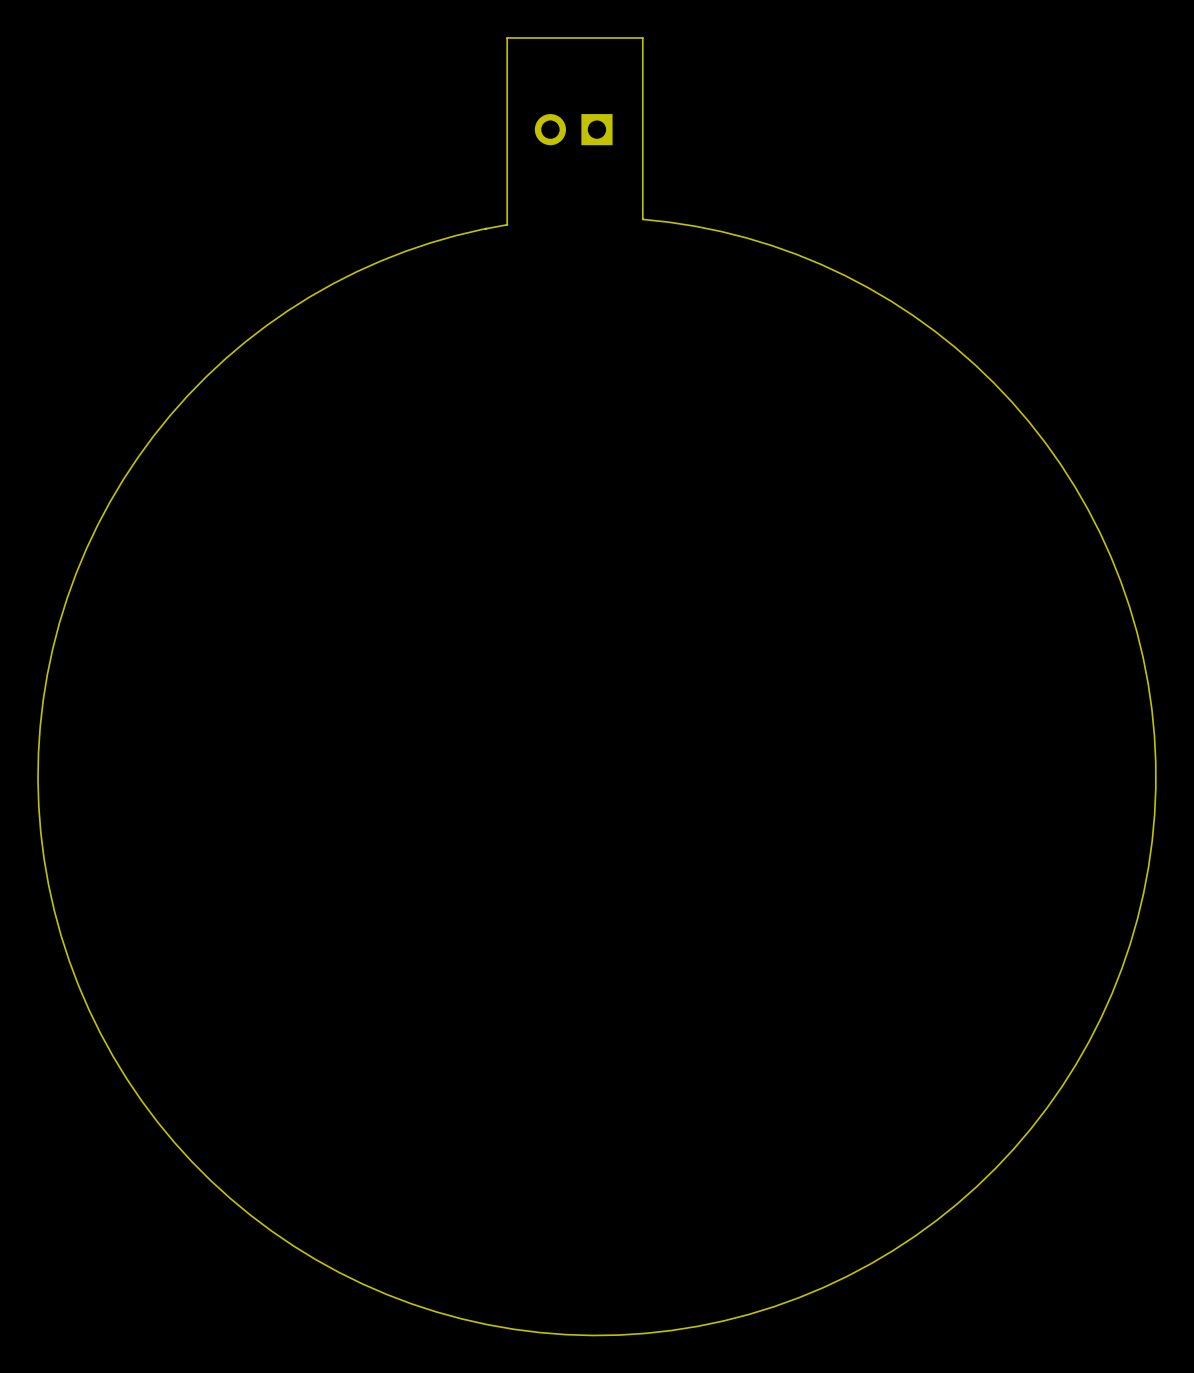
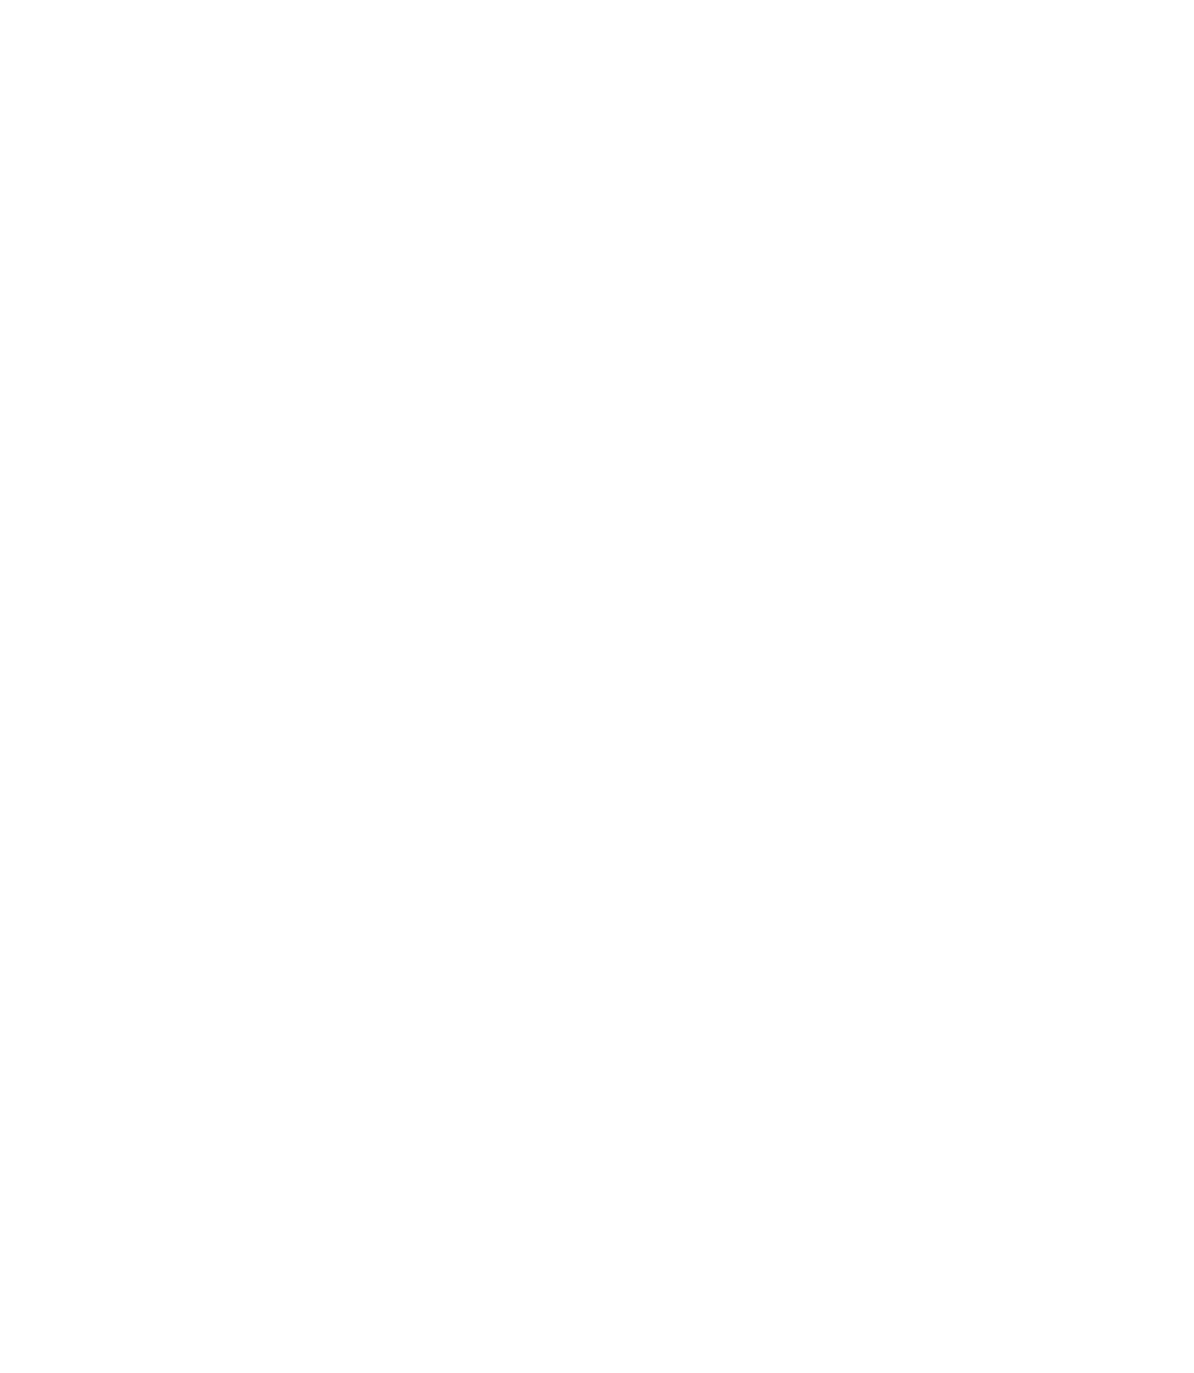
part: (573, 129) -> none
board edge: (507, 224) (481, 229) (455, 235) (405, 251) (356, 271) (288, 310) (245, 341) (206, 376) (170, 415) (138, 457) (110, 502) (86, 549) (67, 598) (47, 674) (40, 727) (38, 779) (40, 832) (48, 884) (61, 935) (78, 985) (100, 1033) (126, 1079) (157, 1122) (192, 1161) (230, 1198) (293, 1245) (339, 1272) (386, 1294) (436, 1312) (487, 1324) (539, 1332) (592, 1335) (645, 1333) (697, 1326) (748, 1314) (798, 1297) (847, 1276) (893, 1250) (936, 1220) (976, 1186) (1013, 1148) (1047, 1108) (1076, 1064) (1101, 1017) (1121, 969) (1143, 893) (1152, 841) (1155, 788) (1154, 735) (1148, 683) (1136, 631) (1120, 581) (1088, 509) (1060, 464) (1029, 422) (975, 364) (934, 330) (891, 301) (821, 264) (771, 245) (720, 231) (642, 219) (642, 38) (507, 38) (507, 224) -> none

